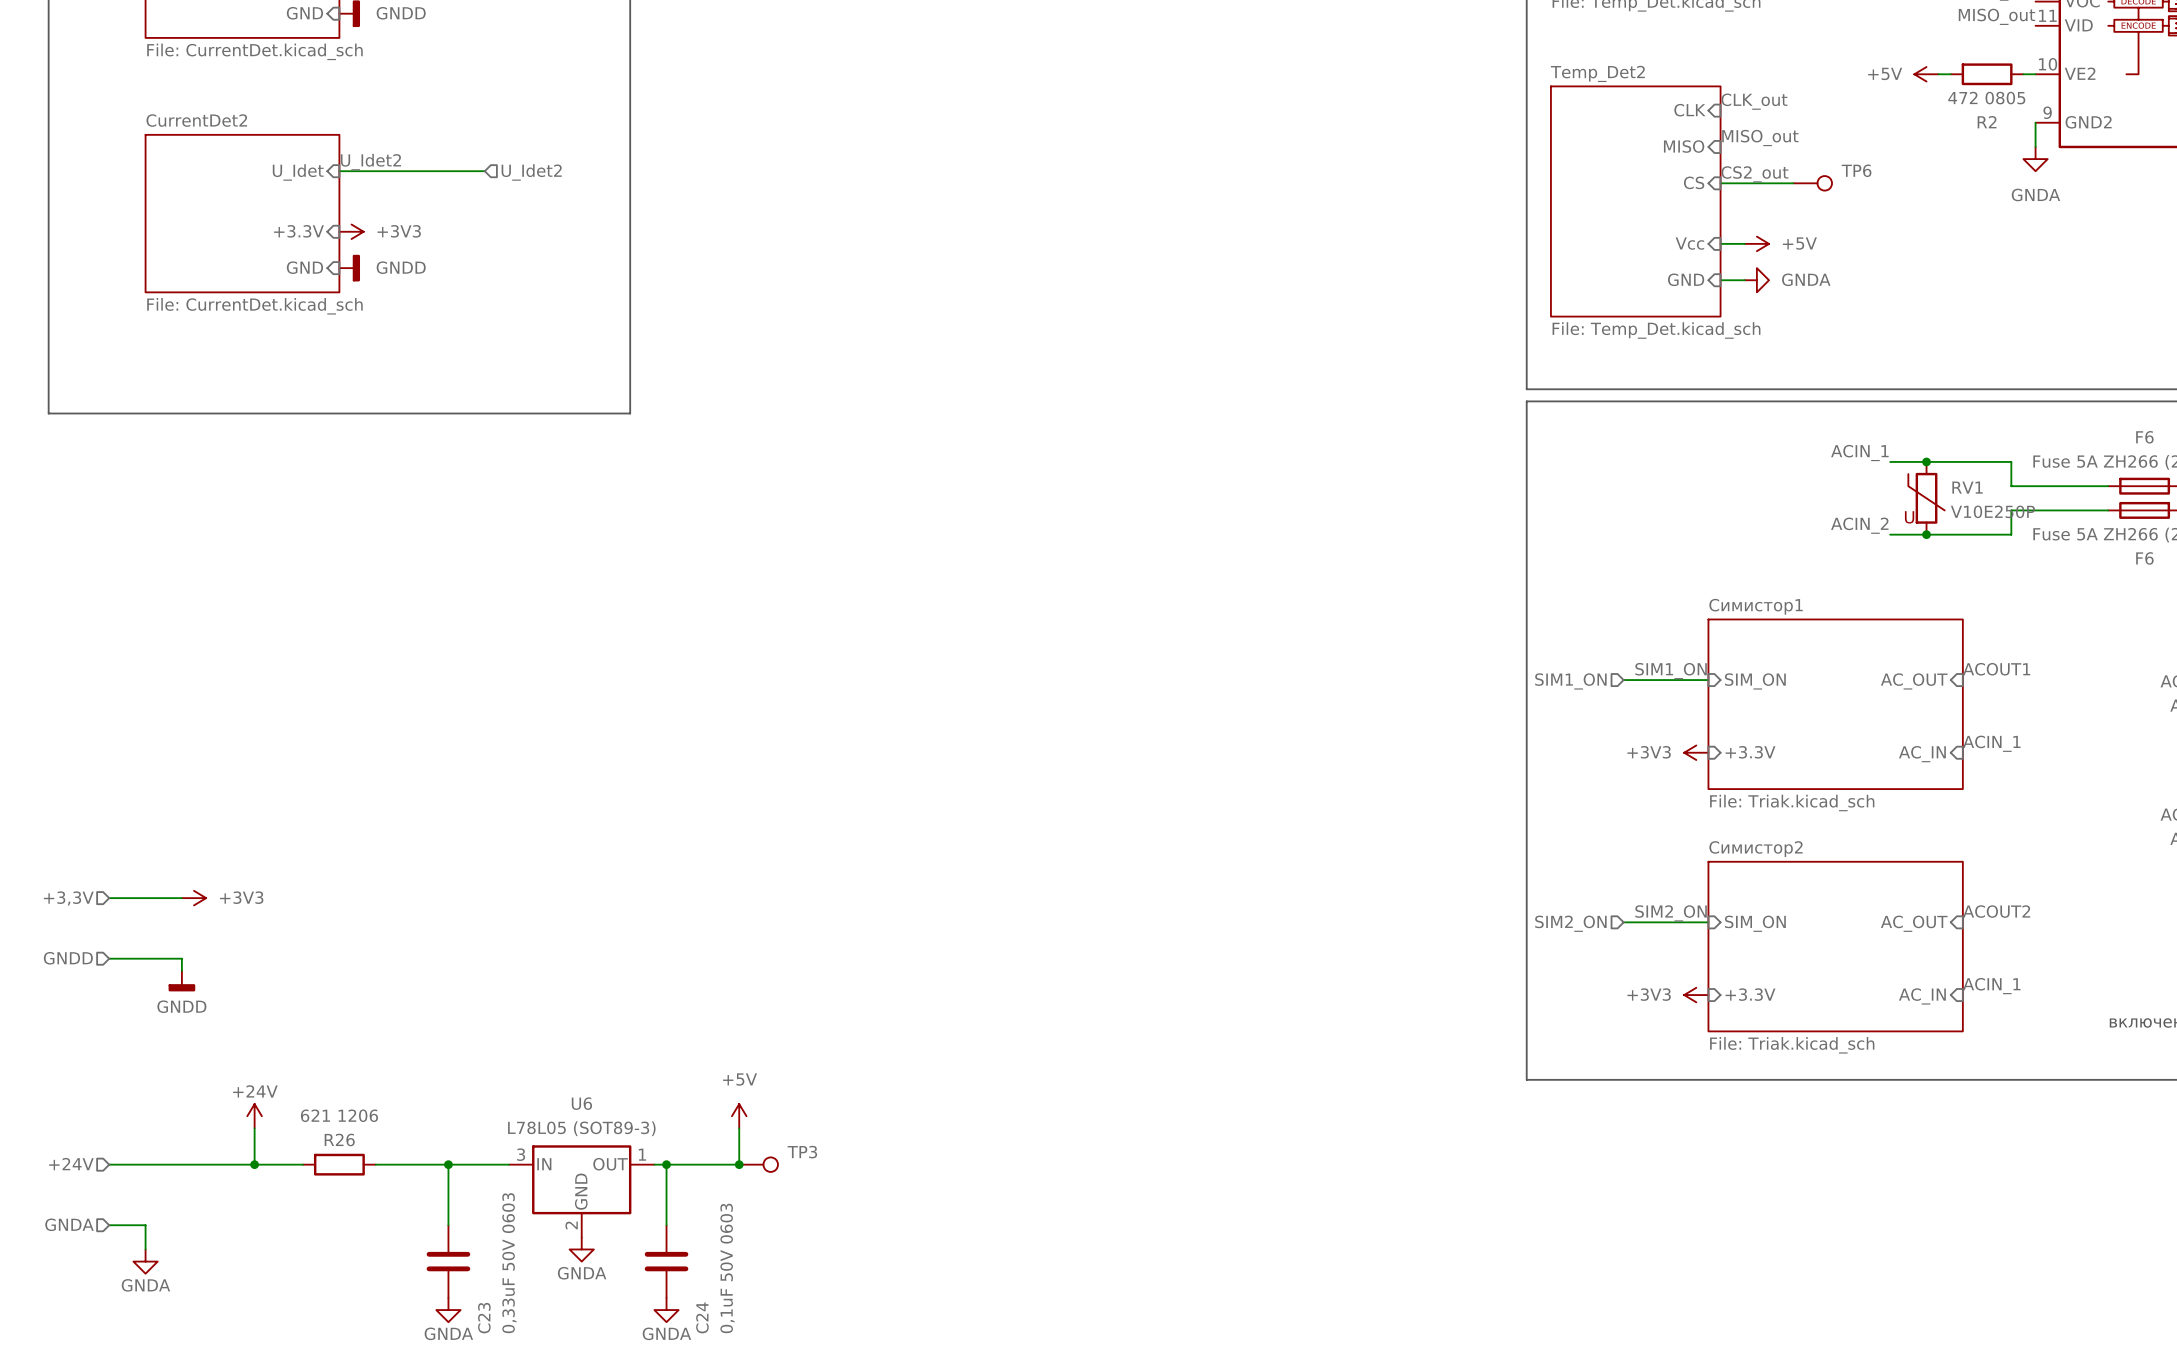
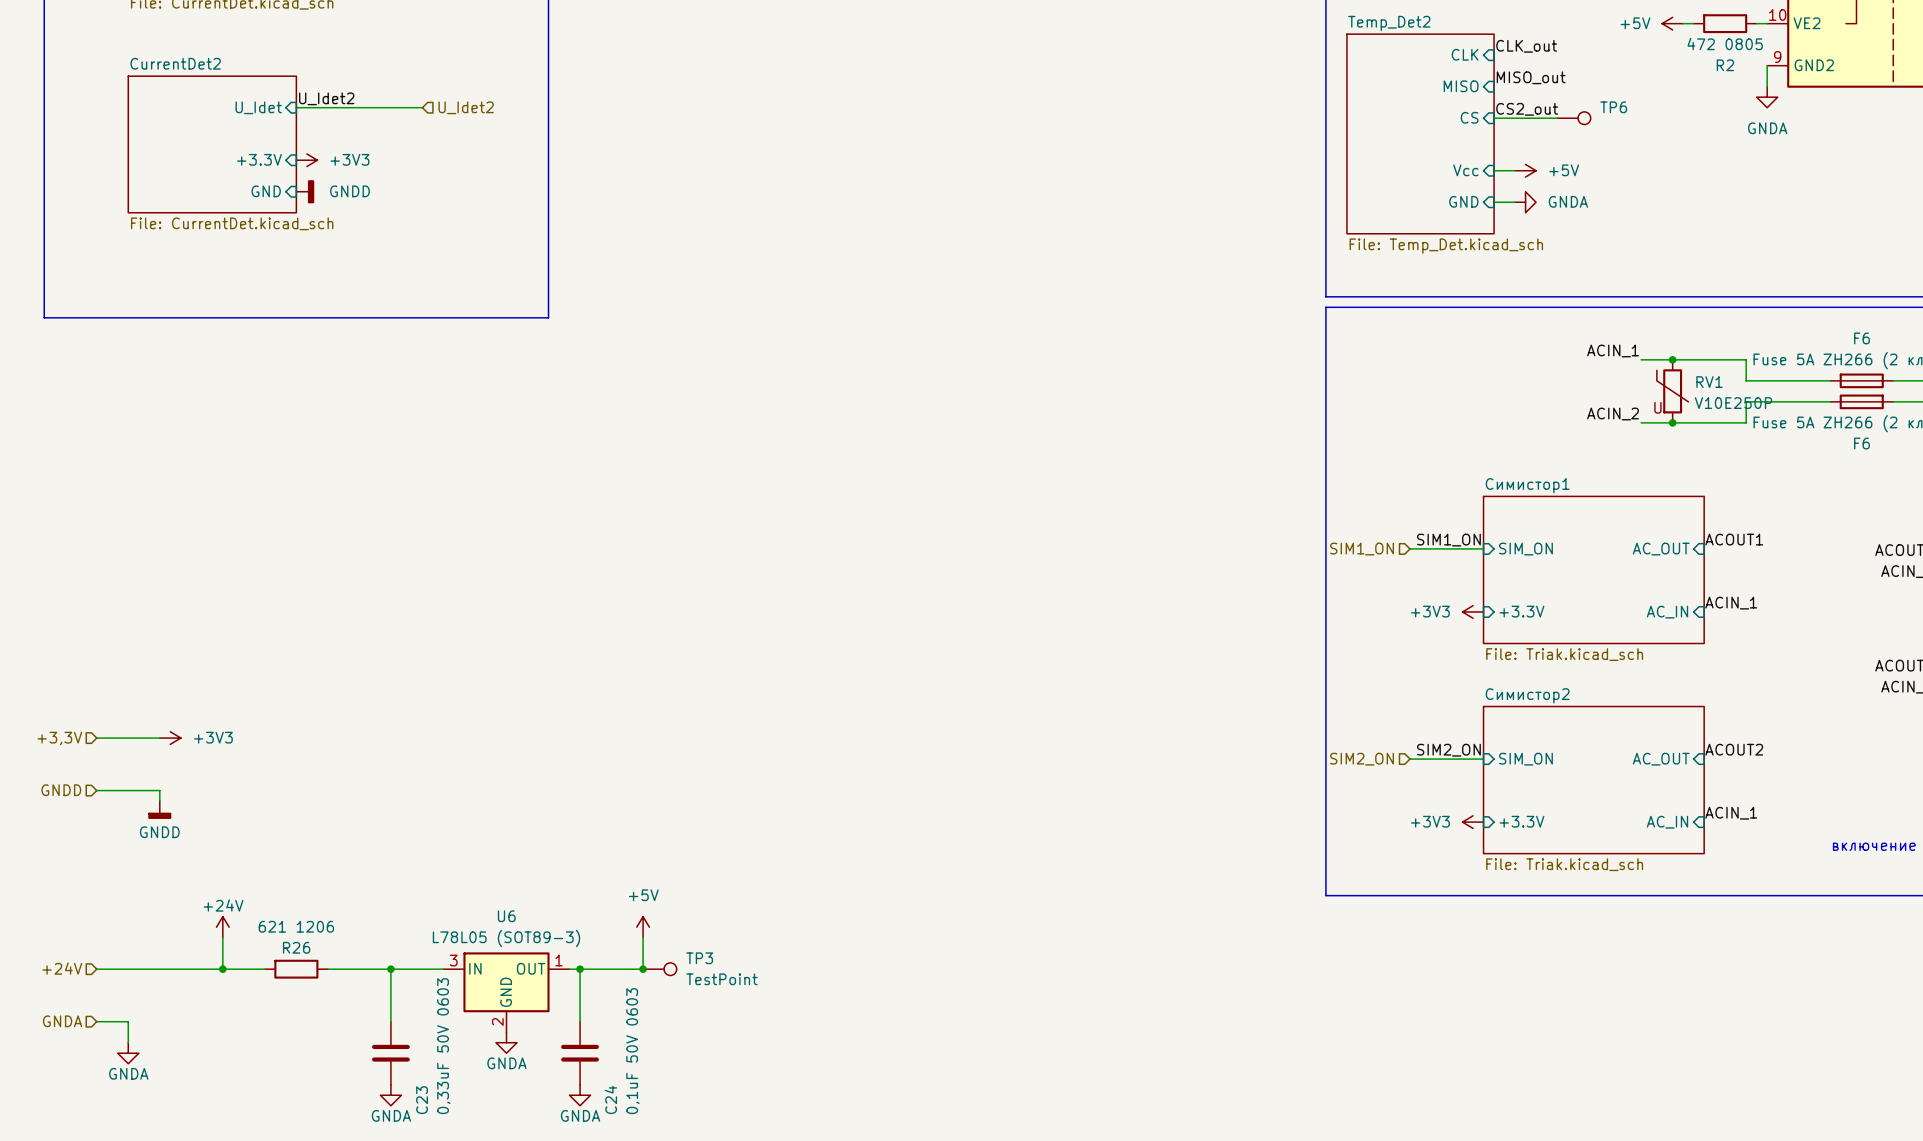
TP3 value: none -> TestPoint (721, 979)

